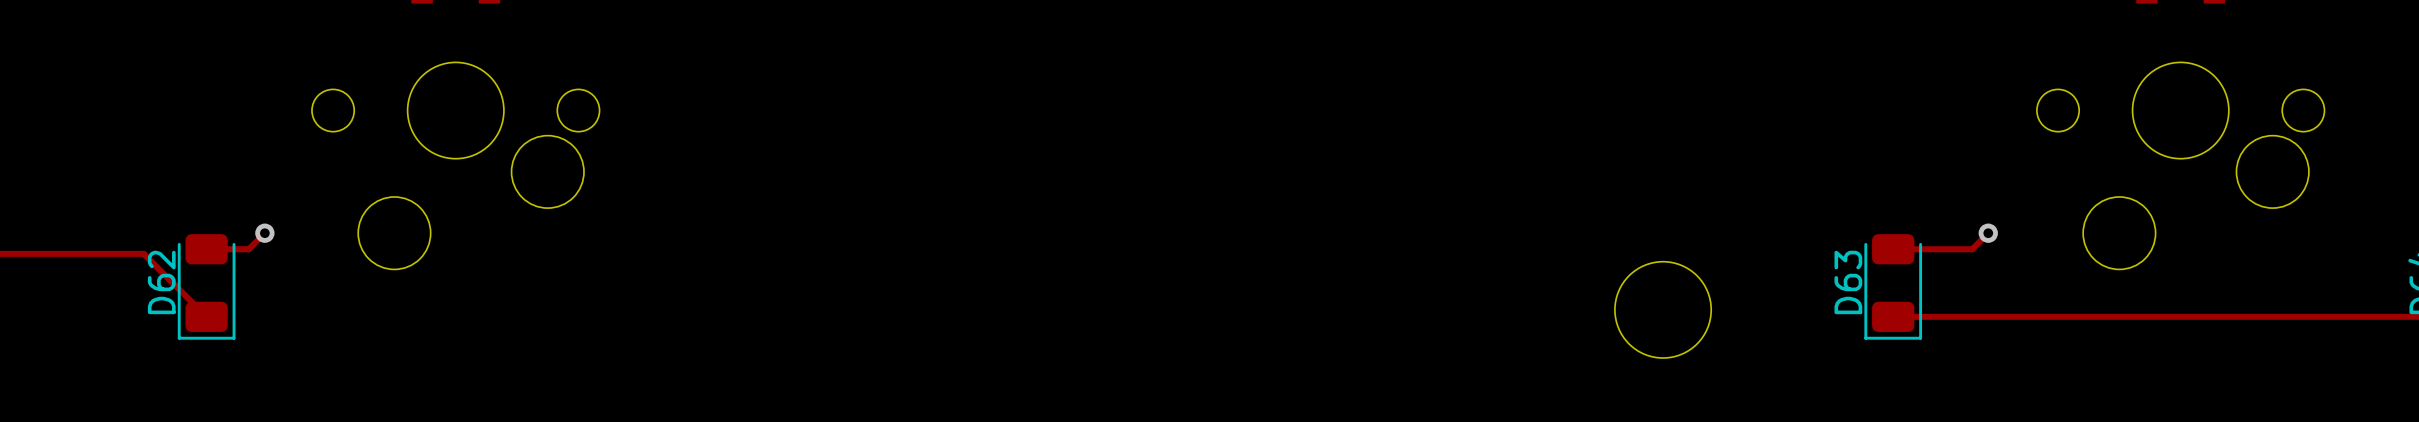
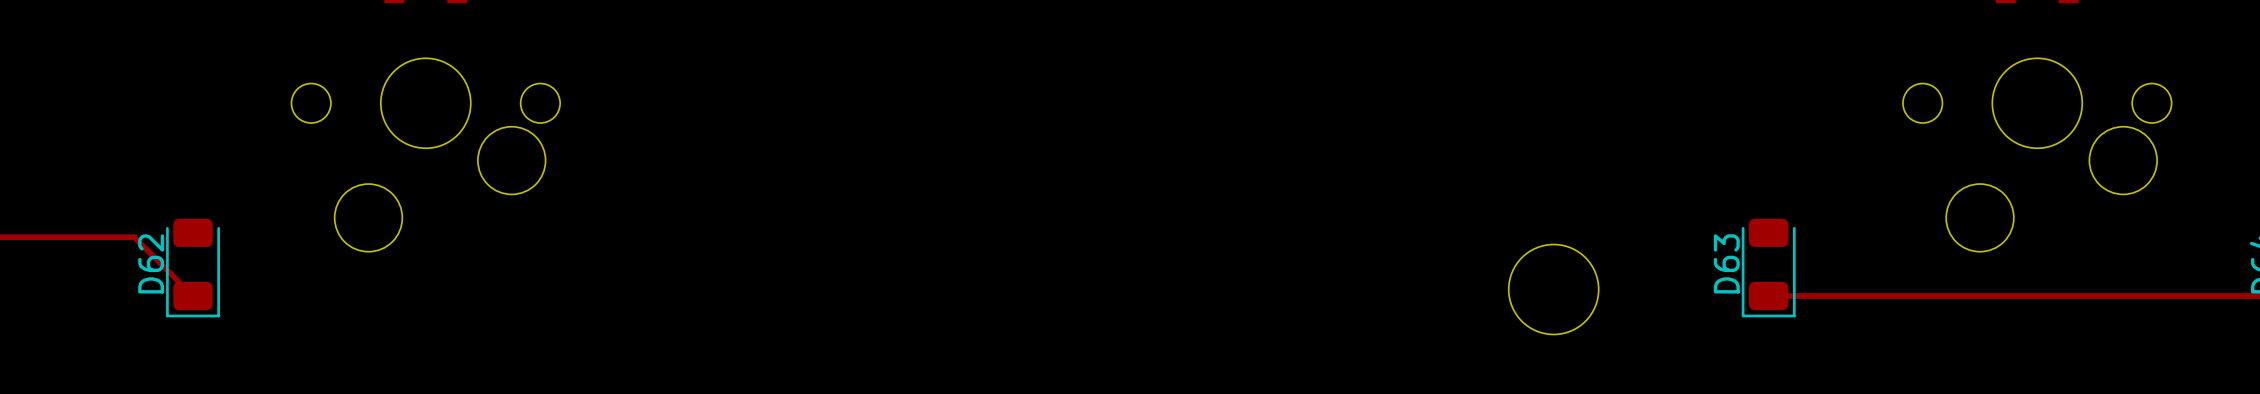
track: (264, 233) (248, 249) (206, 249) -> none
via: (264, 233) -> none
track: (1988, 233) (1972, 249) (1893, 249) -> none
via: (1988, 233) -> none

